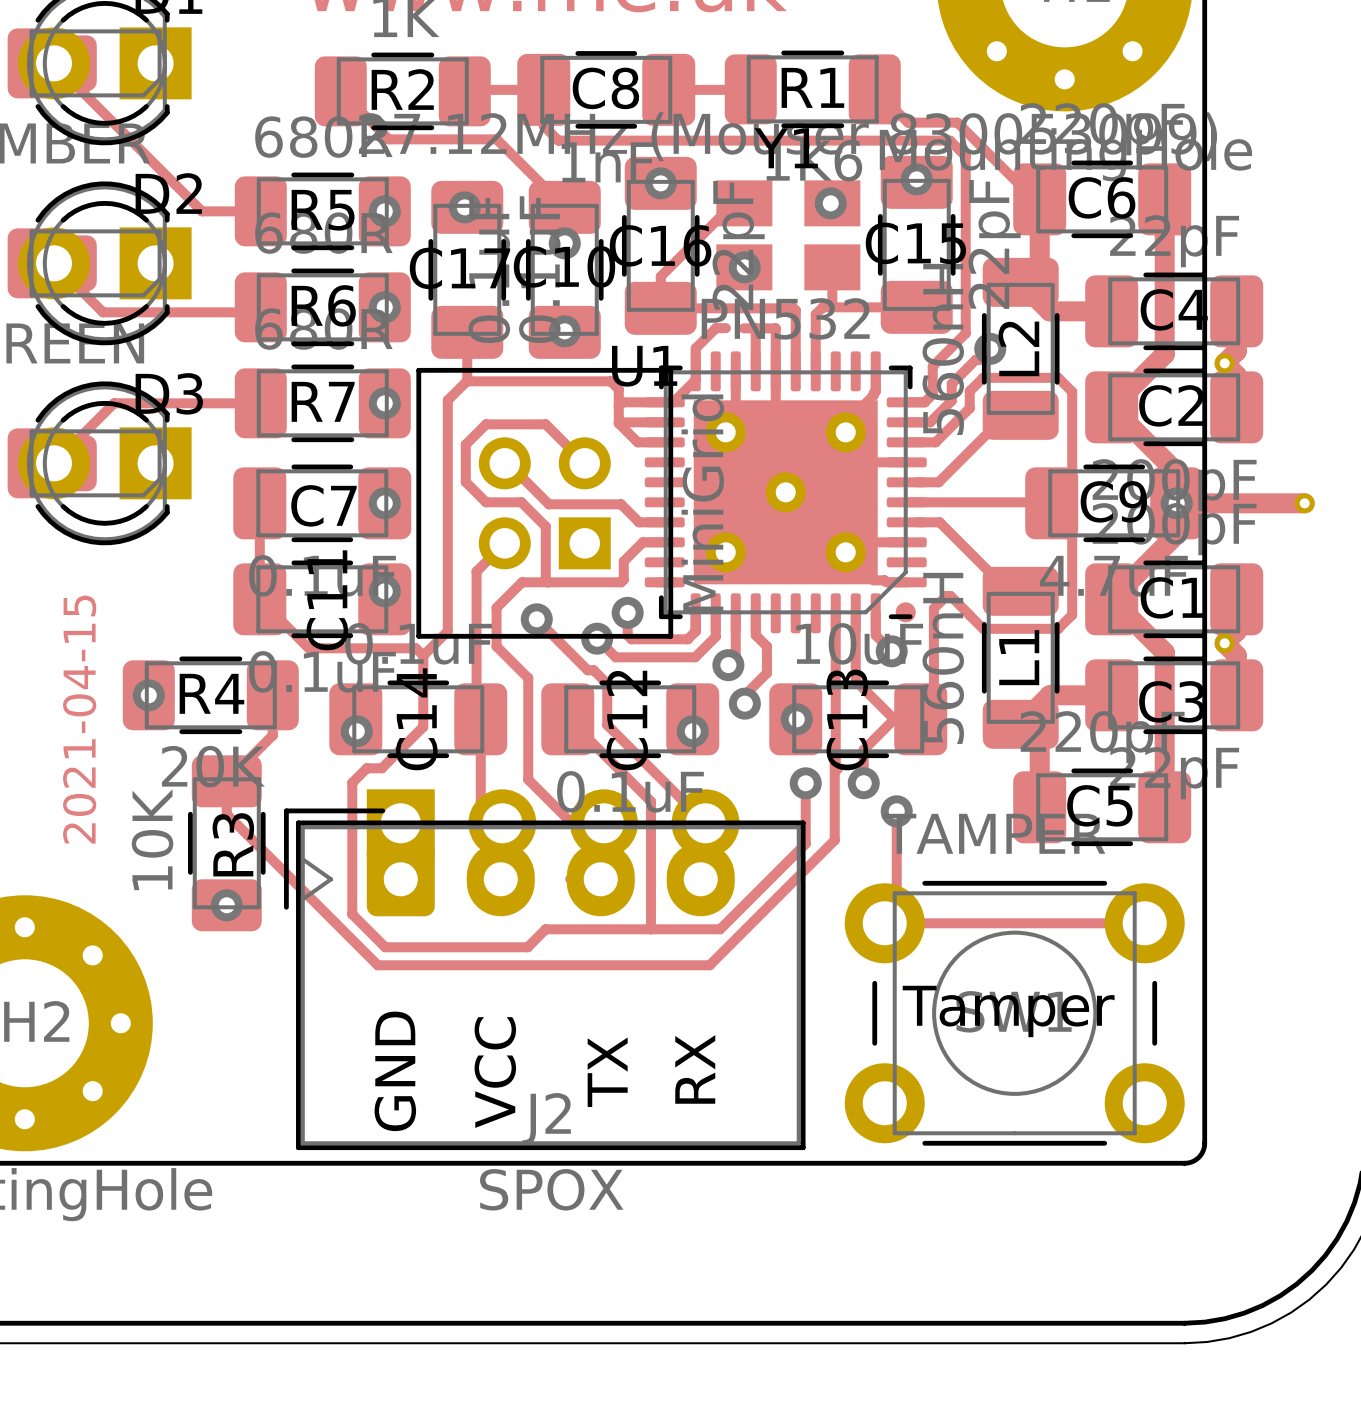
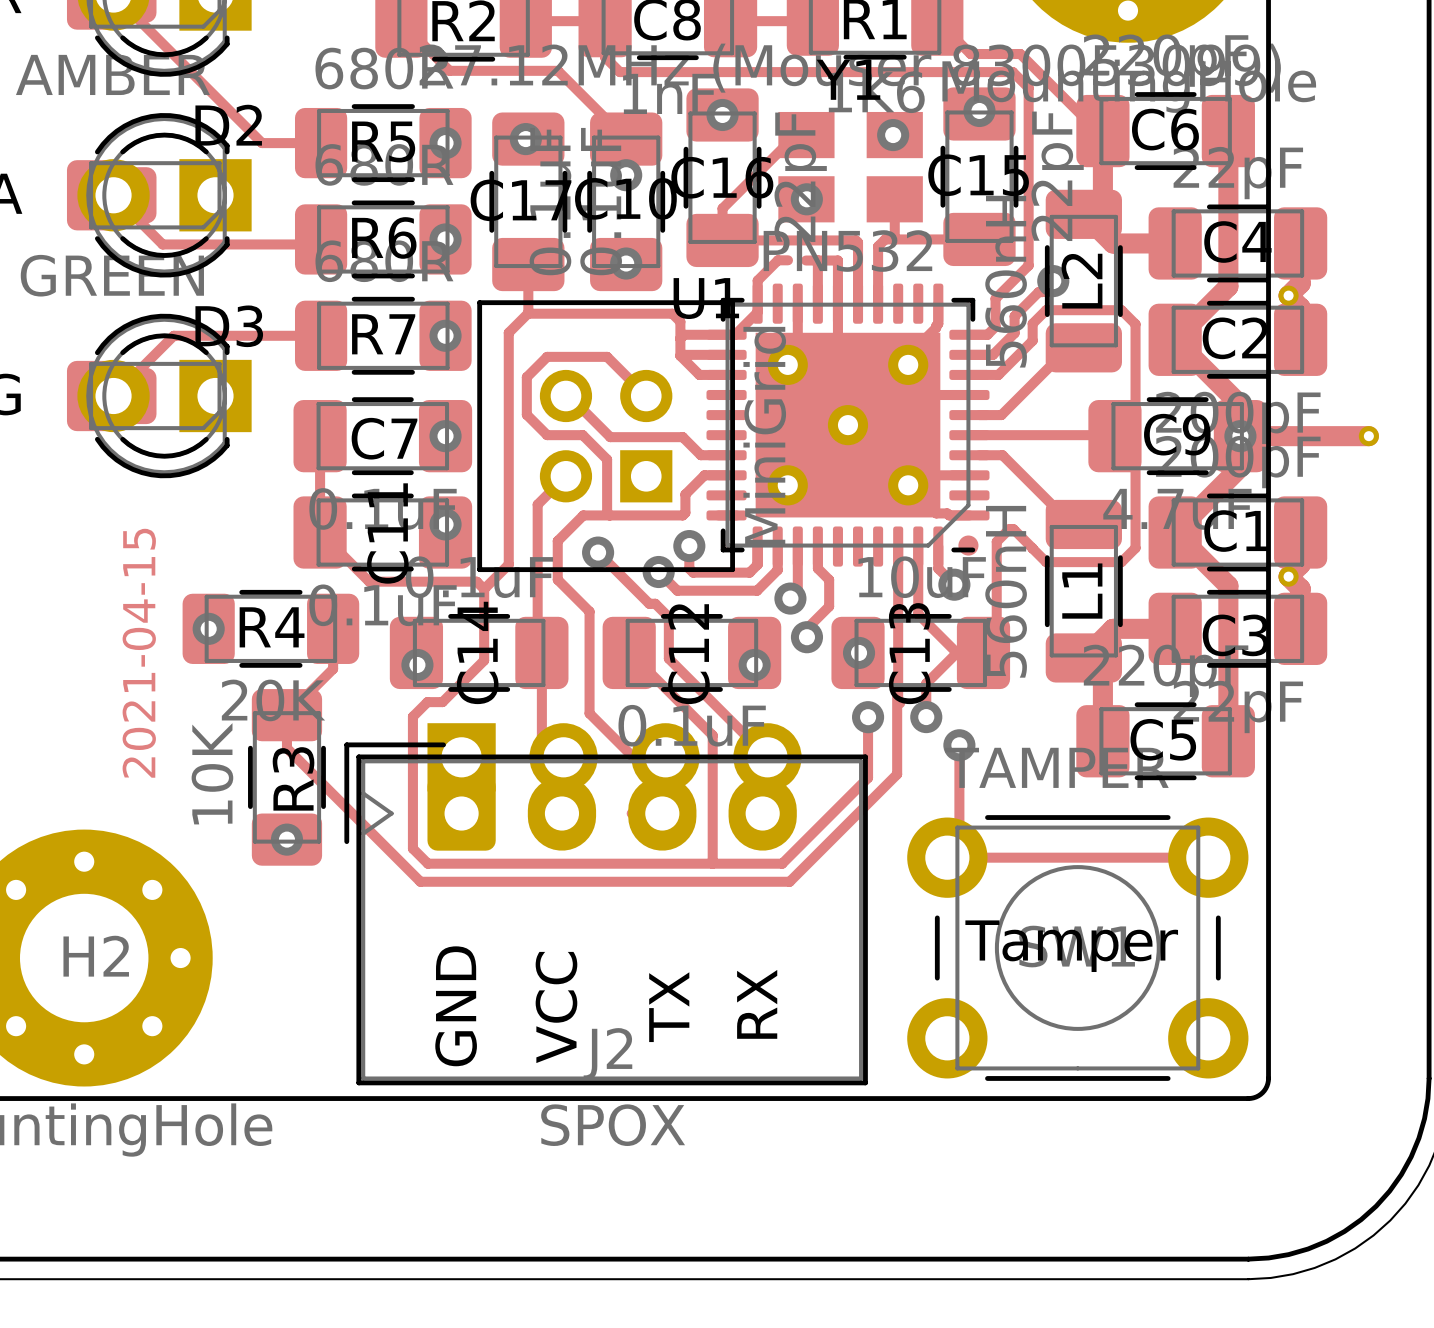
track: (367, 929) (385, 947) -> (420, 881) (446, 881)
track: (545, 929) (527, 947) -> (607, 863) (427, 863)
track: (359, 947) (377, 965) (709, 965) (727, 947) -> (588, 881) (789, 881)

